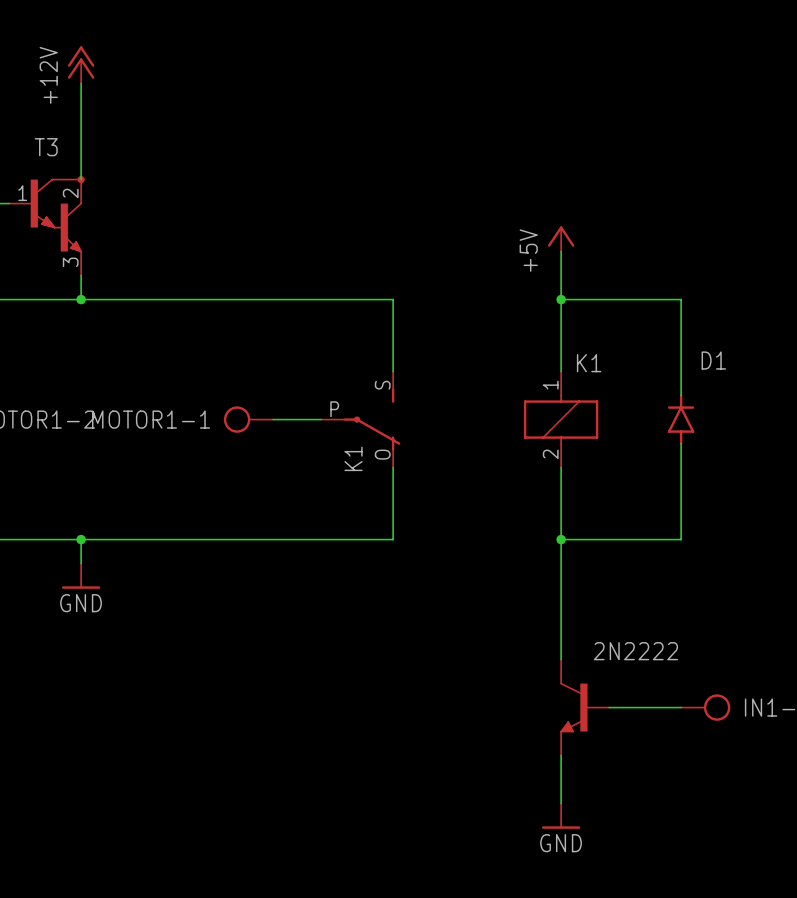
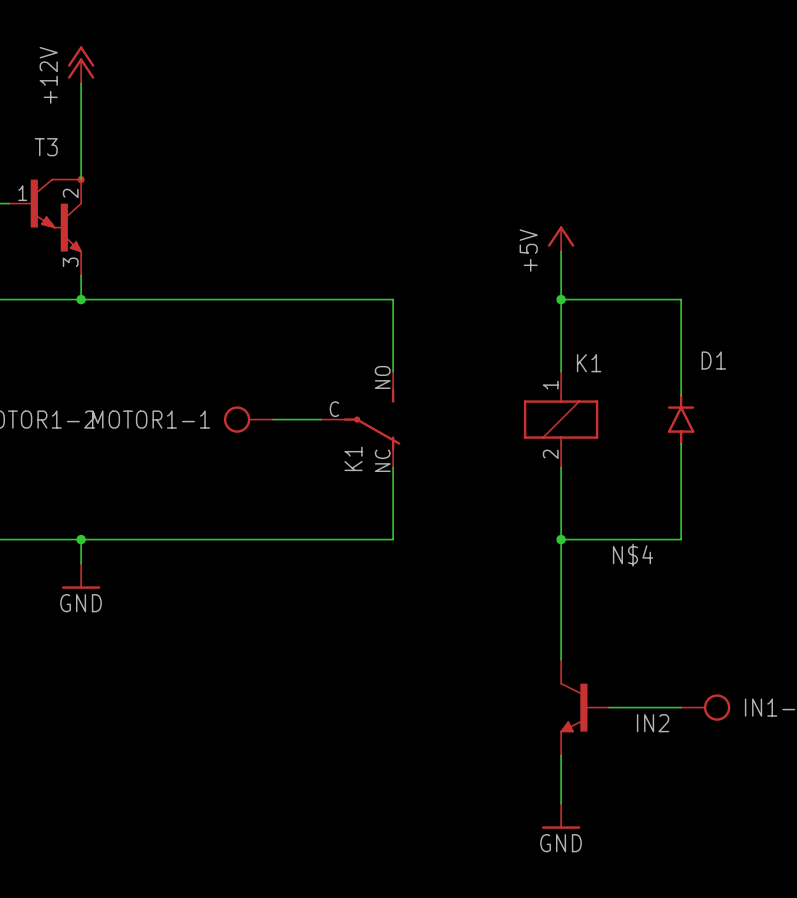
K1 pin number: S (382, 385) -> NO (382, 377)
K1 pin number: P (334, 409) -> C (334, 409)
K1 pin number: O (382, 454) -> NC (382, 460)
label: none -> N$4 (633, 555)
part value: 2N2222 (635, 651) -> none
label: none -> IN2 (653, 723)

